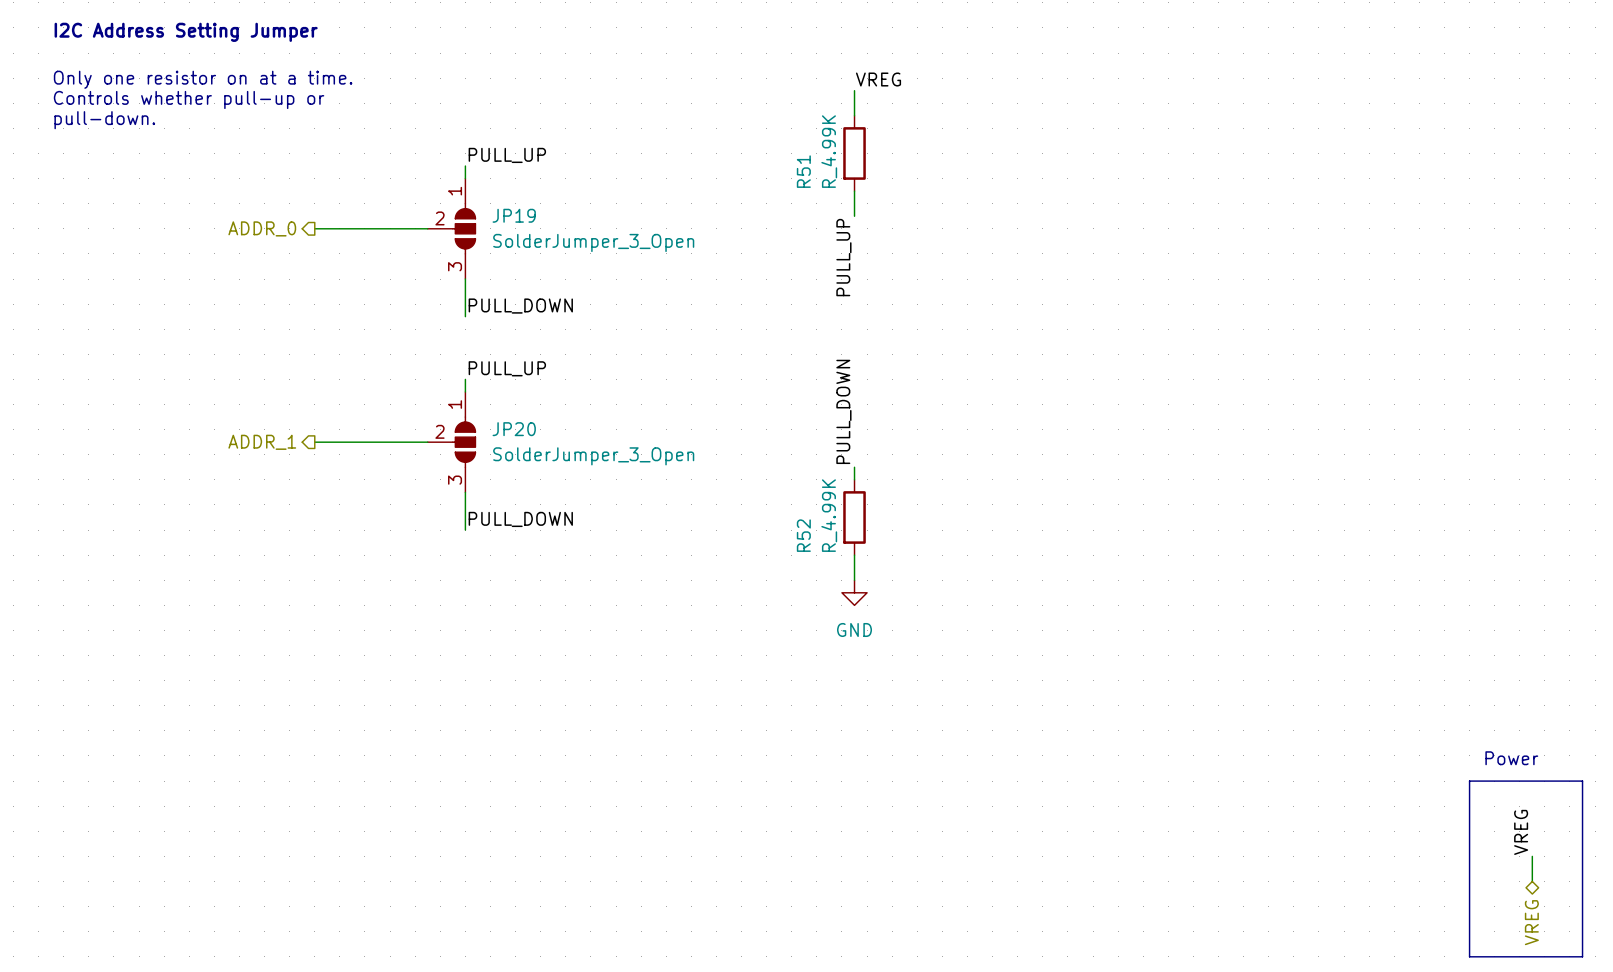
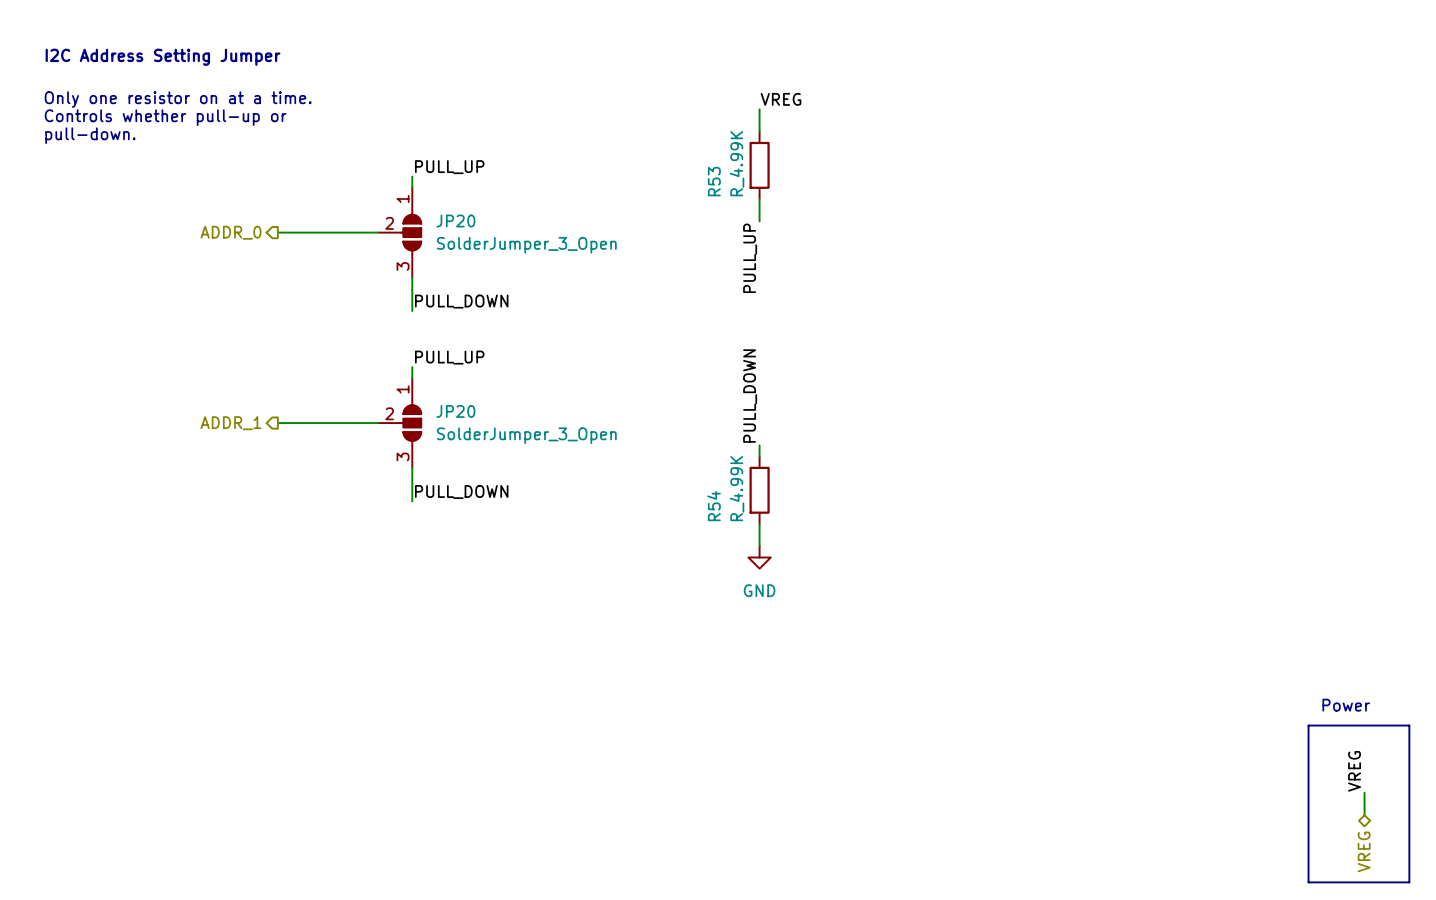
R51 name: R51 (803, 171) -> R53 (714, 181)
JP19 name: JP19 (514, 215) -> JP20 (455, 220)
R52 name: R52 (803, 535) -> R54 (714, 506)

